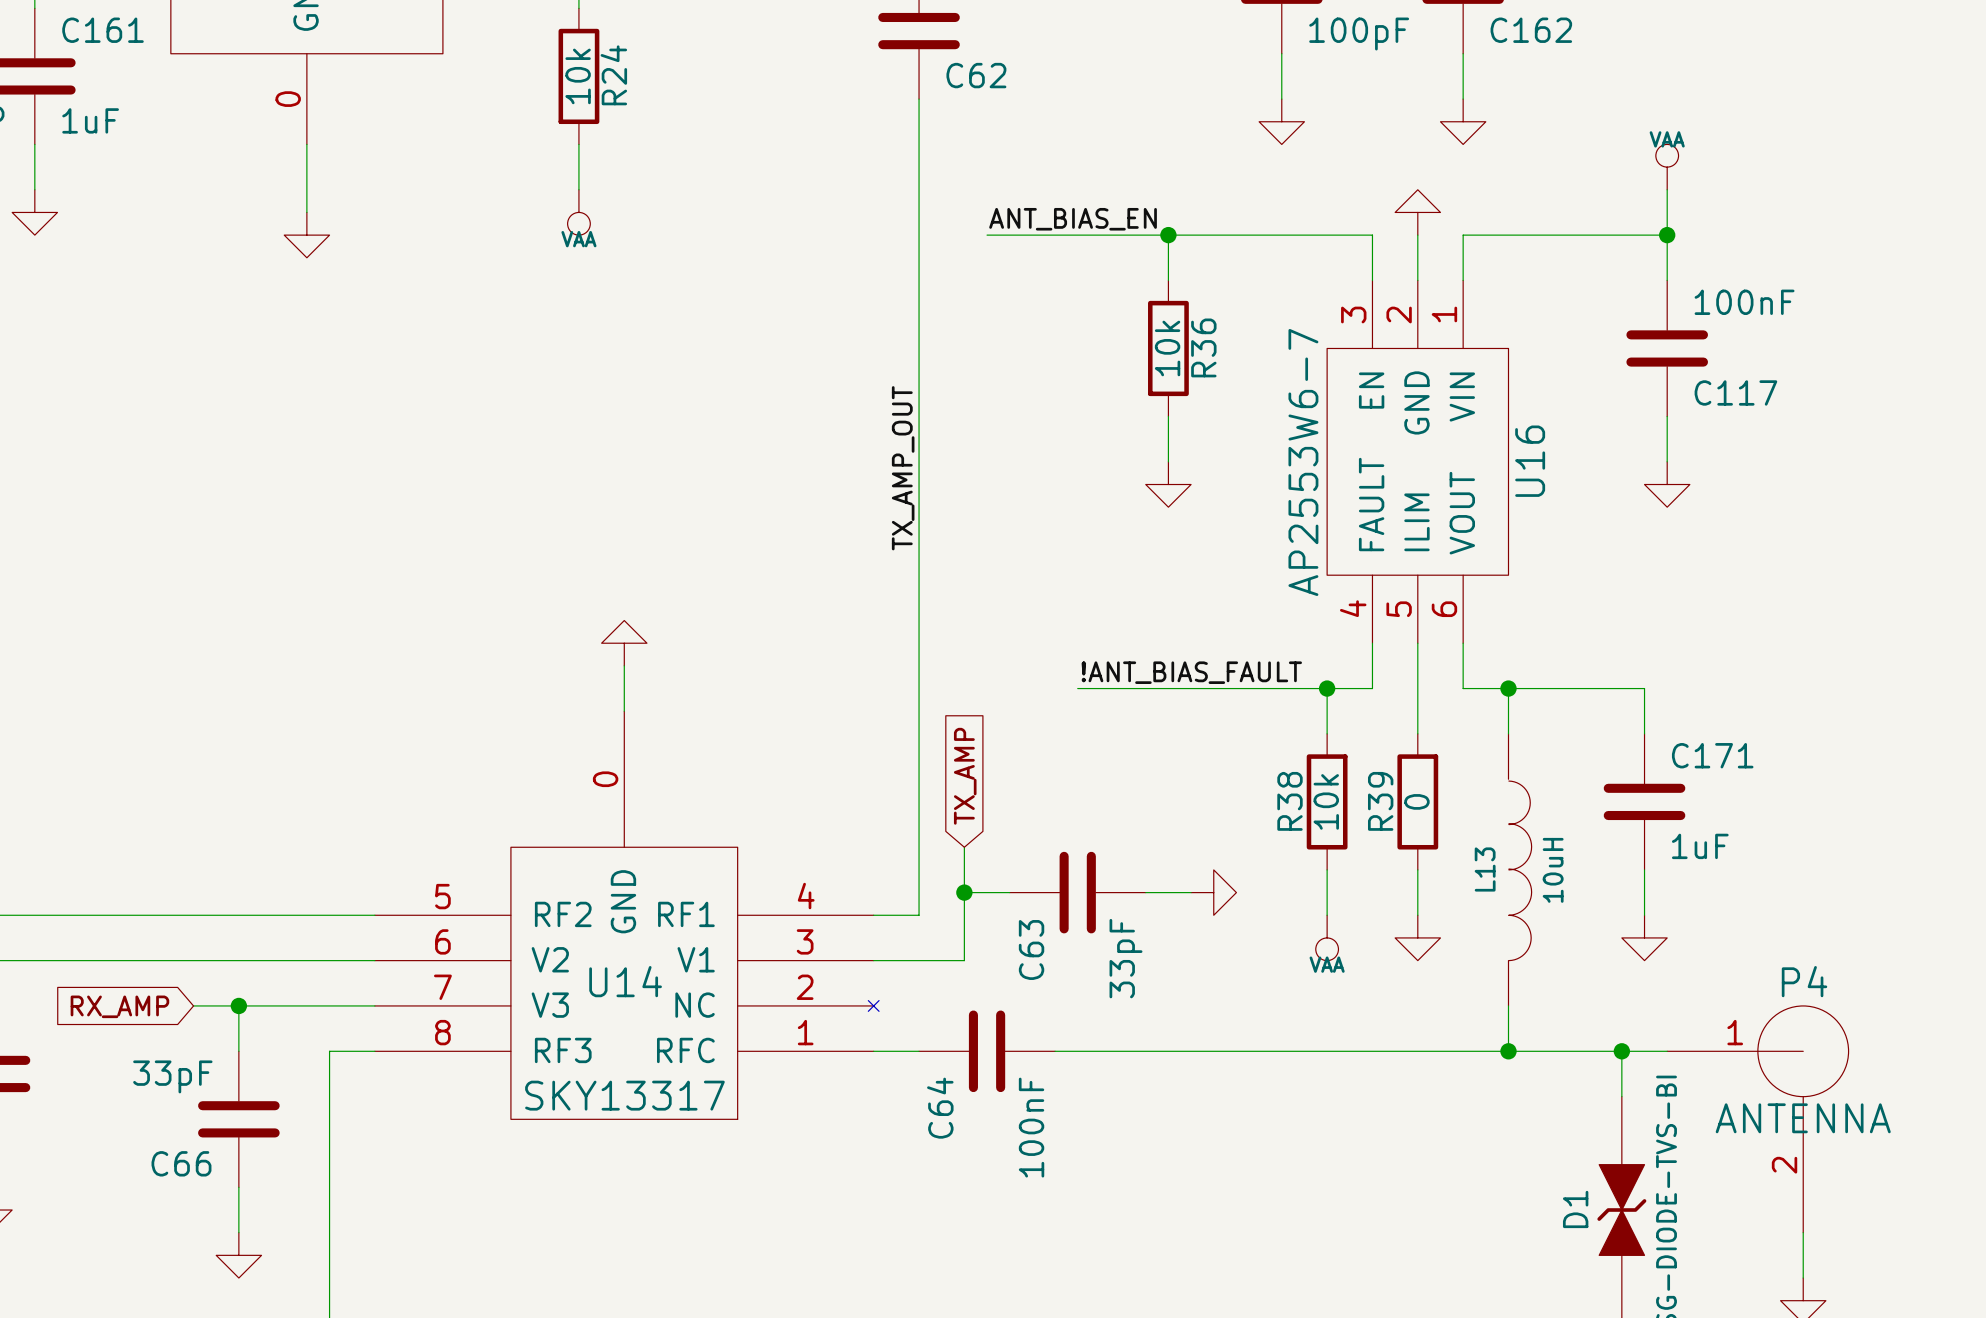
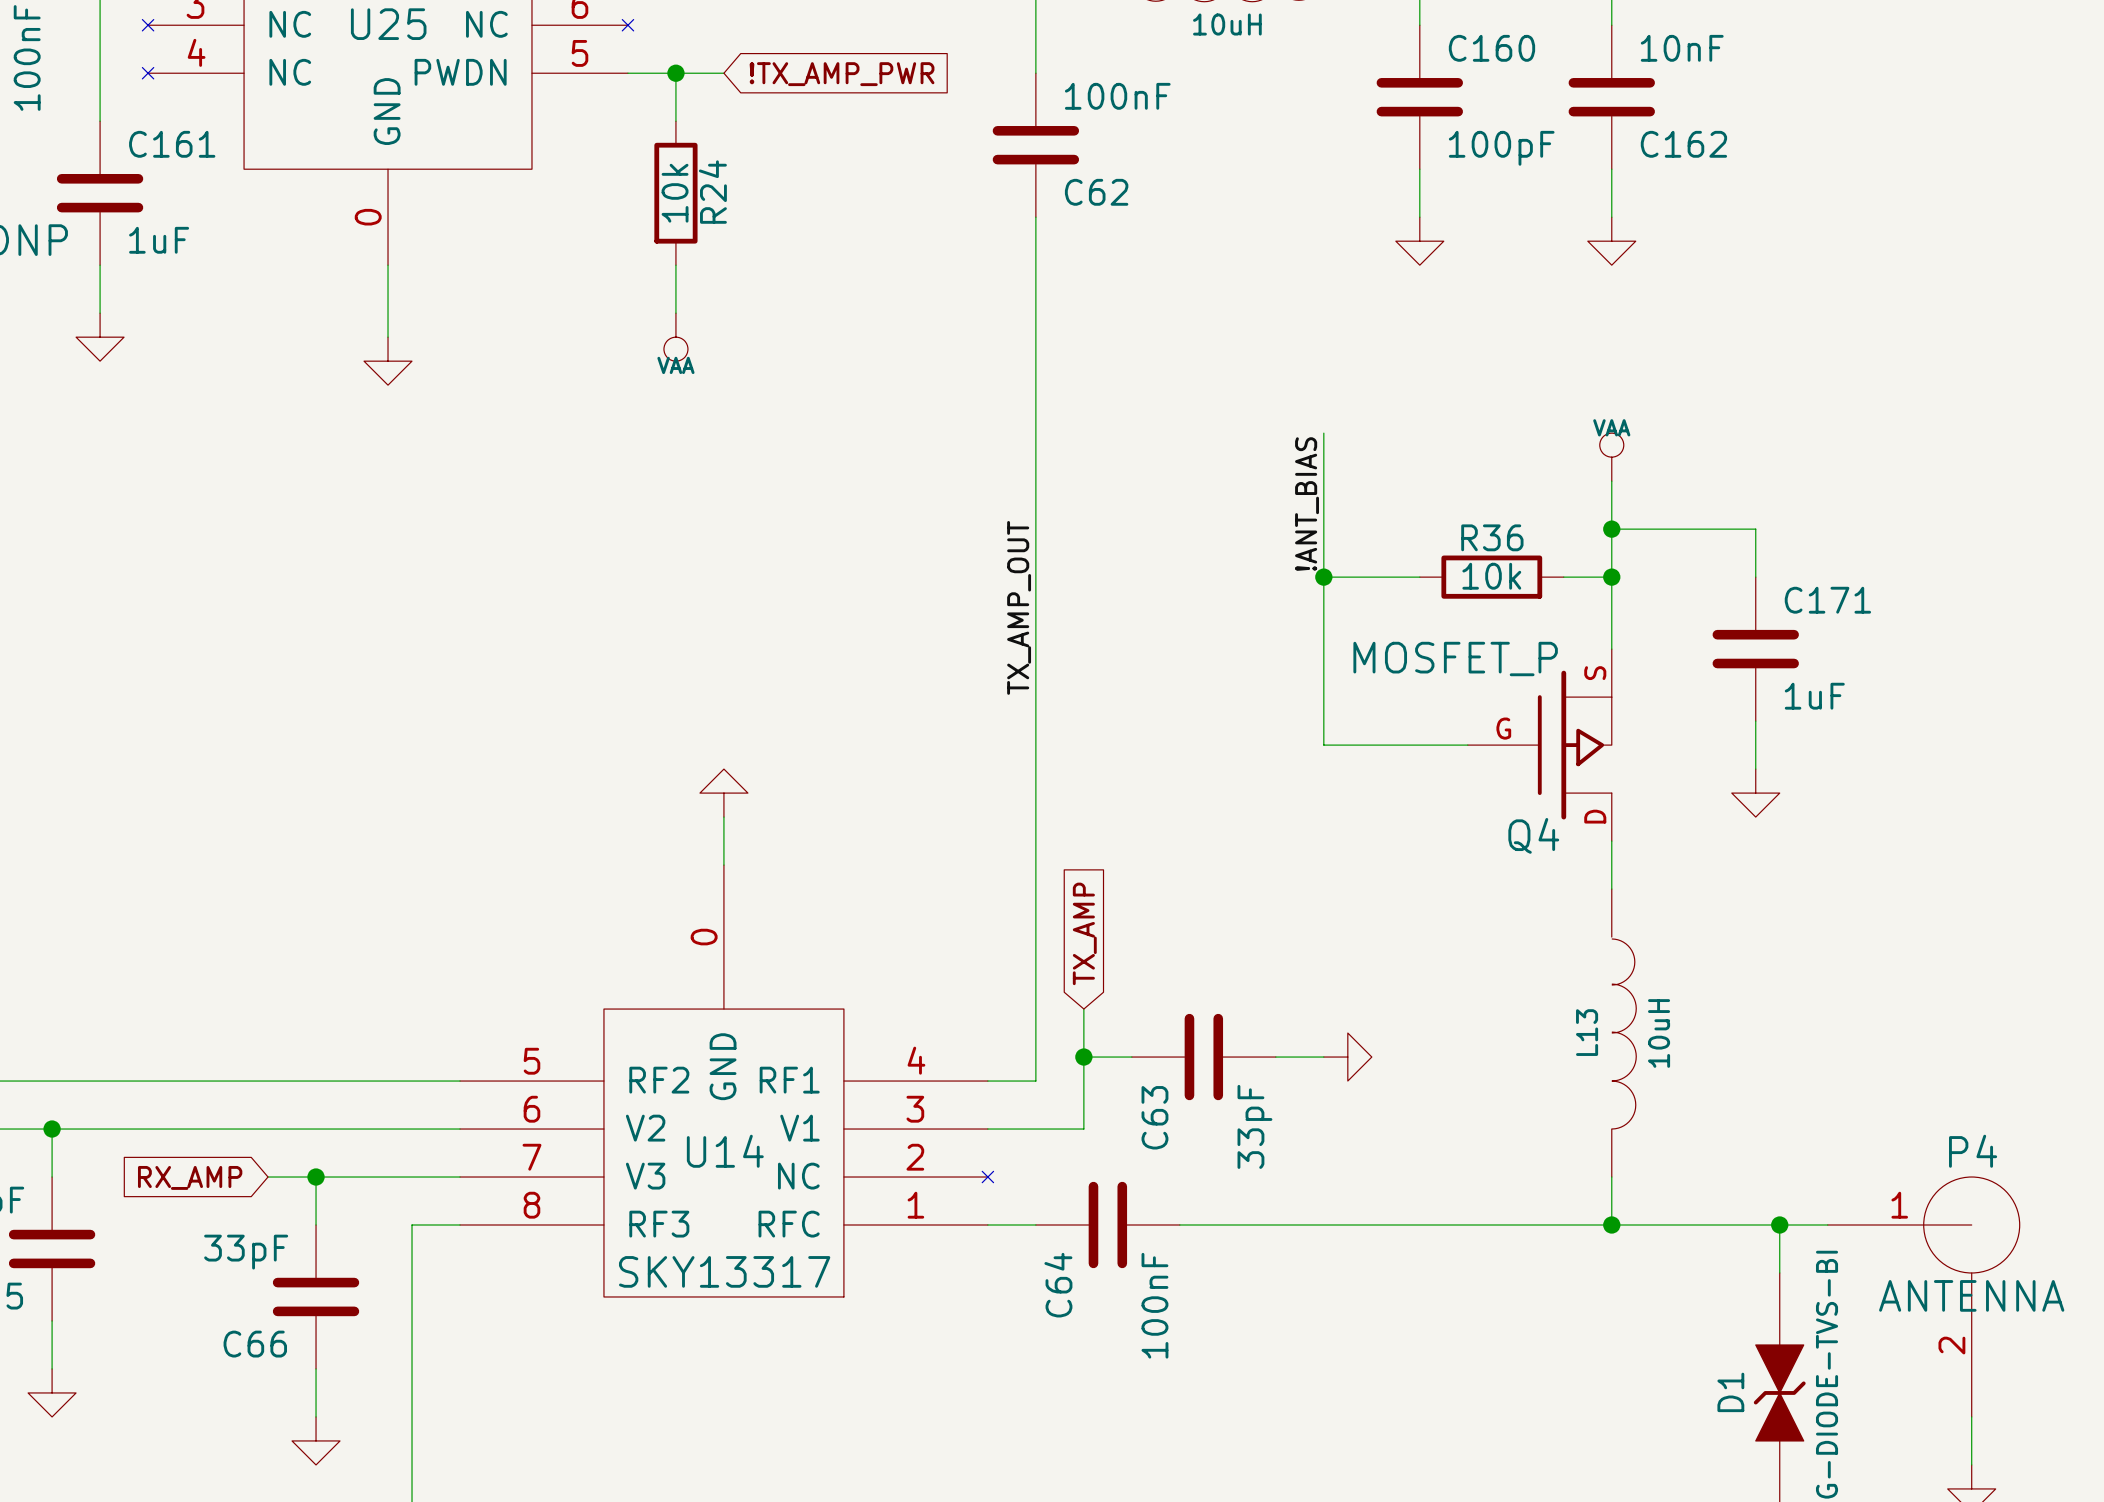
power symbol position: VAA (1667, 167) -> VAA (1611, 457)
wire: (1667, 189) (1667, 280) -> none
power symbol: (1417, 212) -> none
label: ANT_BIAS_EN (1073, 219) -> none
wire: (987, 235) (1372, 235) (1372, 280) -> none
wire: (1168, 235) (1168, 280) -> none
junction: (1168, 235) -> none
wire: (1417, 235) (1417, 280) -> none
wire: (1667, 235) (1463, 235) (1463, 280) -> none
junction: (1667, 235) -> none
wire: none -> (1323, 433) (1323, 745) (1467, 745)
R36 name position: R36 (1203, 347) -> R36 (1492, 537)
R36 rotation: 0° (1168, 348) -> 90° clockwise (1491, 577)
R36 position: (1168, 348) -> (1491, 577)
wire: none -> (1611, 481) (1611, 649)
C117: 100nF (1667, 348) -> none
label: none -> !ANT_BIAS (1307, 504)
wire: none -> (1611, 529) (1755, 529) (1755, 577)
junction: none -> (1611, 529)
wire: (1168, 416) (1168, 461) -> none
wire: (1667, 416) (1667, 461) -> (1755, 721) (1755, 769)
wire: none -> (1323, 577) (1419, 577)
junction: none -> (1323, 577)
wire: none -> (1563, 577) (1611, 577)
junction: none -> (1611, 577)
U16: AP2553W6-7 (1417, 461) -> none
power symbol: (1168, 484) -> none
power symbol: (1667, 484) -> none
Q4: none -> MOSFET_P (1539, 745)
wire: (1372, 643) (1372, 688) (1077, 688) -> none
wire: (1417, 643) (1417, 733) -> none
wire: (1463, 643) (1463, 688) (1644, 688) (1644, 733) -> none
power symbol: none -> (1755, 793)
label: !ANT_BIAS_FAULT (1191, 672) -> none
wire: (1327, 688) (1327, 733) -> none
junction: (1327, 688) -> none
wire: (1508, 688) (1508, 733) -> (1611, 841) (1611, 889)
junction: (1508, 688) -> none
R38: 10k (1327, 801) -> none
R39: 0 (1417, 801) -> none
C171 position: (1644, 801) -> (1755, 649)
wire: (1327, 869) (1327, 915) -> none
wire: (1417, 869) (1417, 915) -> none
L13 position: (1520, 869) -> (1624, 1033)
wire: (1644, 869) (1644, 915) -> none
power symbol: VAA (1327, 937) -> none
power symbol: (1417, 937) -> none
power symbol: (1644, 937) -> none
wire: (1508, 1005) (1508, 1051) -> (1611, 1177) (1611, 1225)
junction position: (1508, 1051) -> (1611, 1225)

